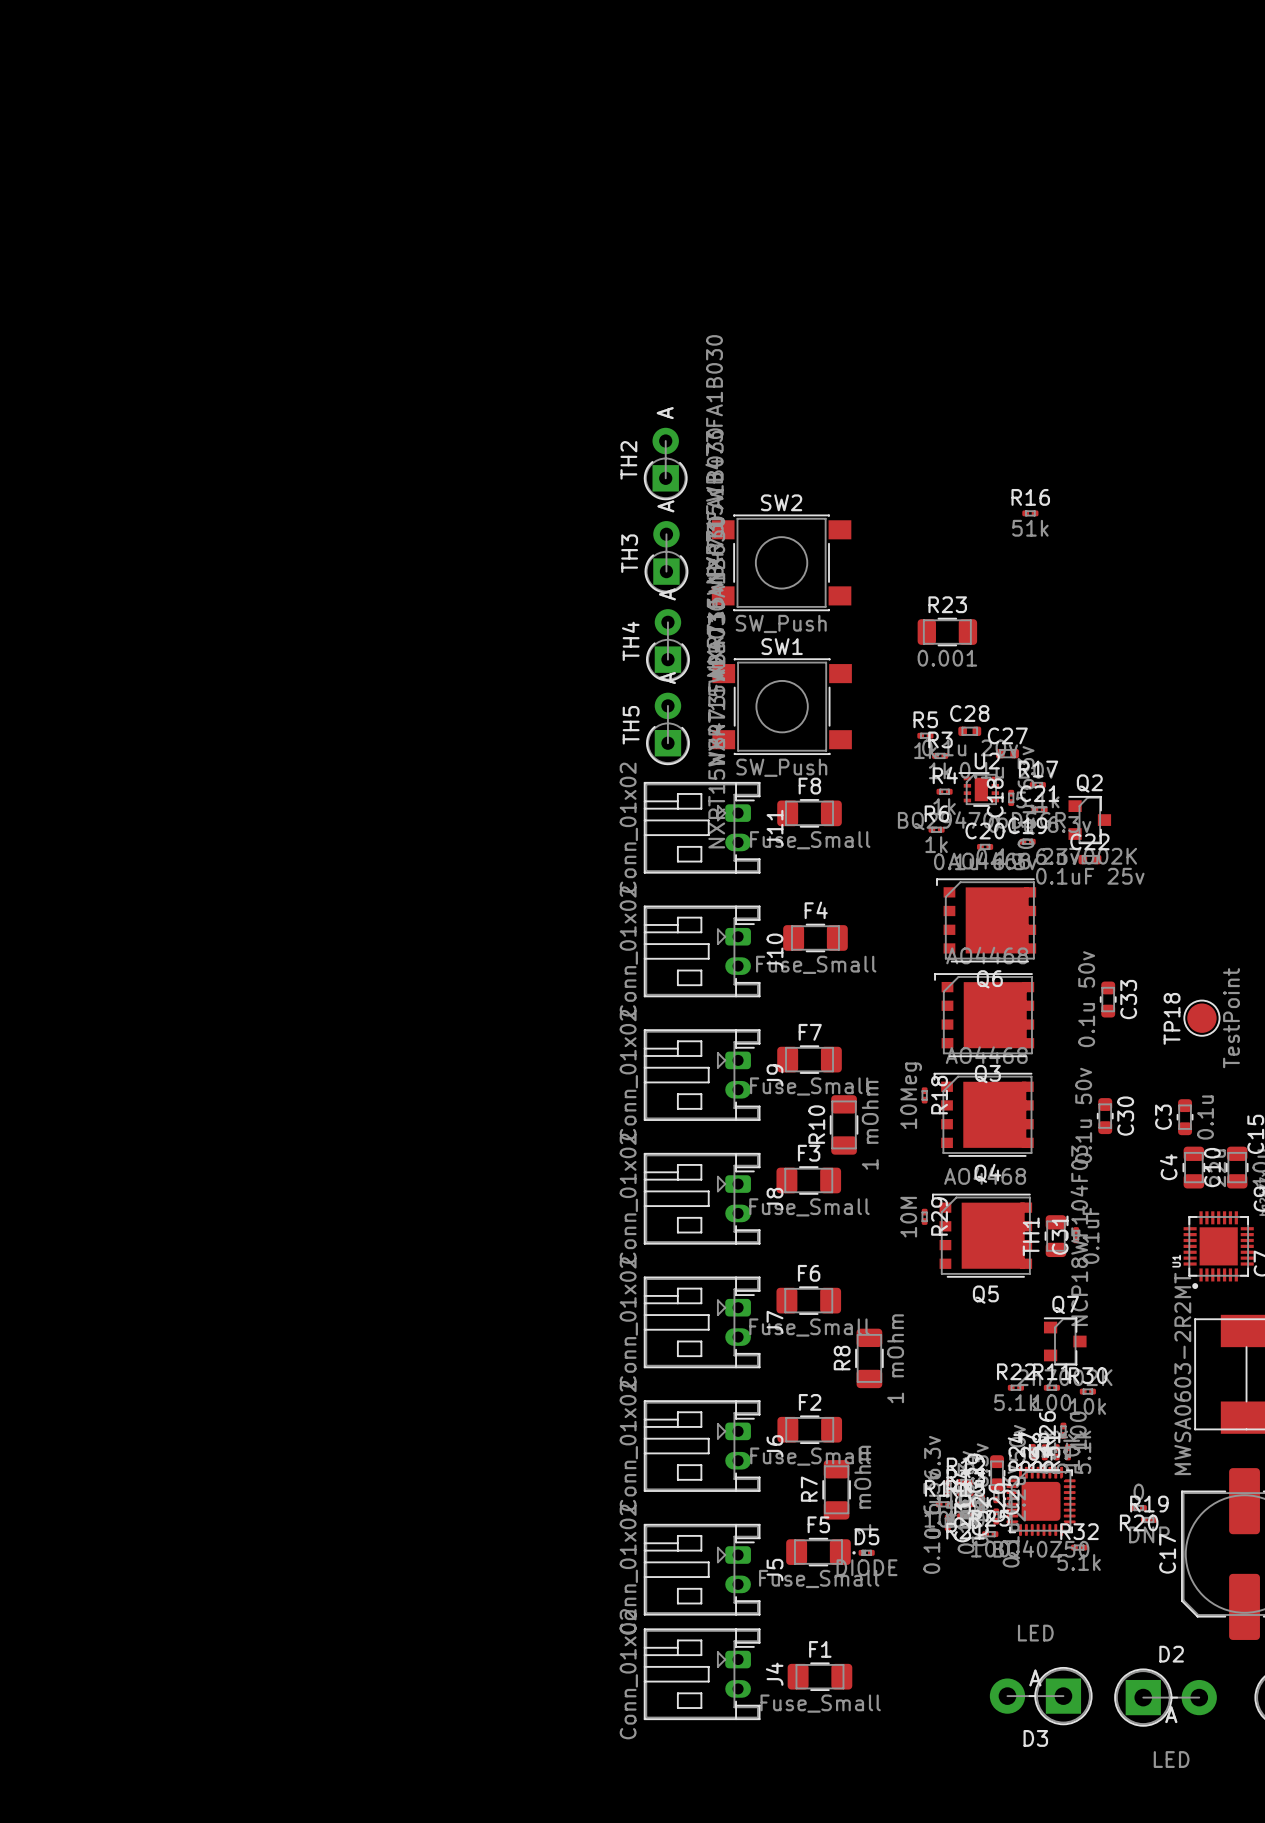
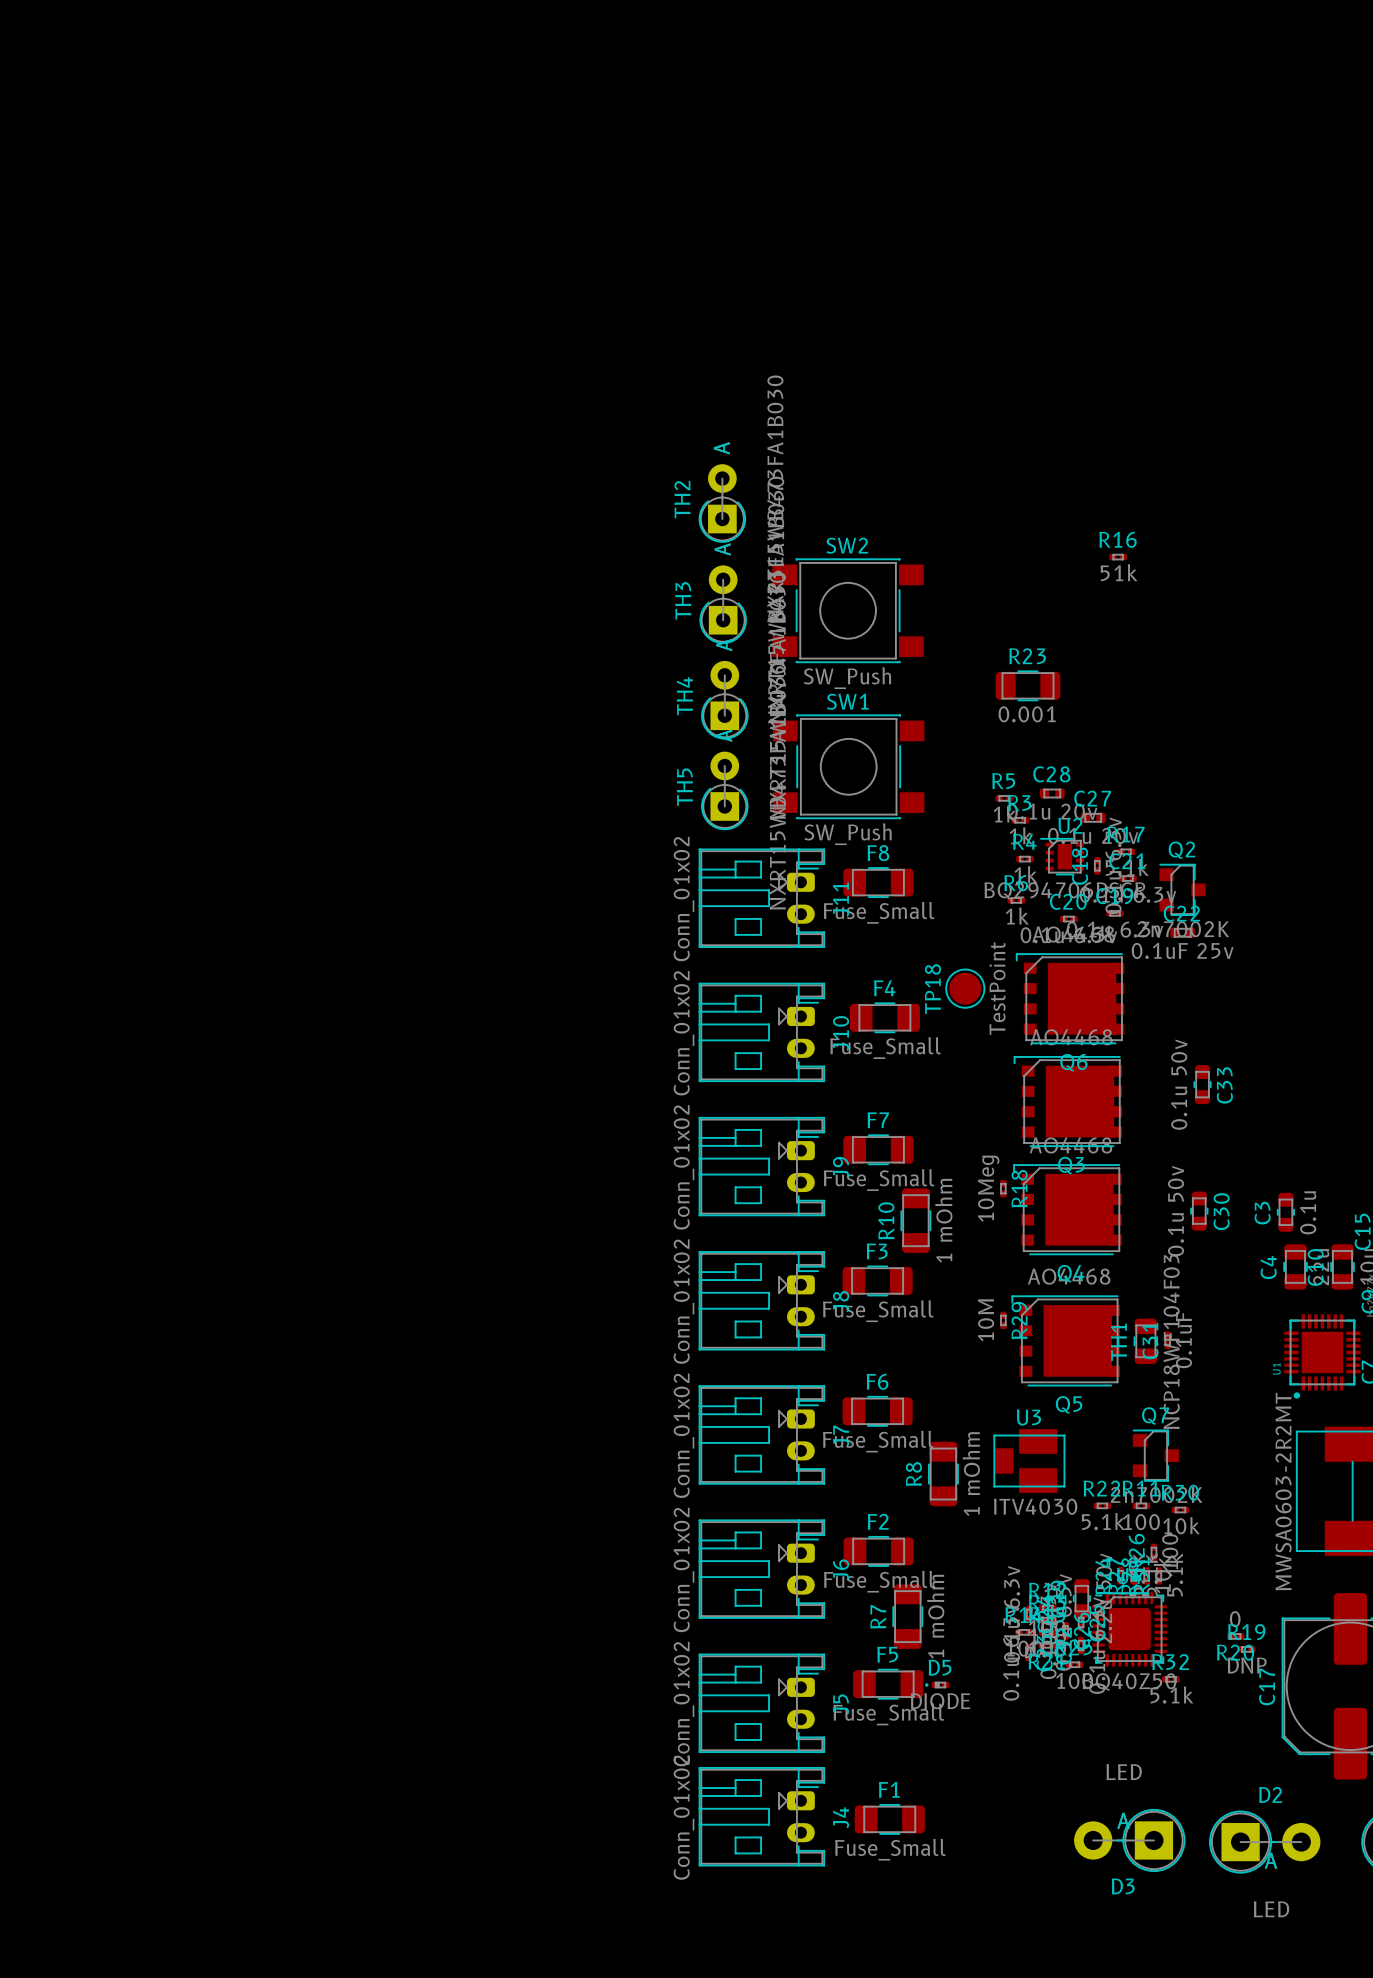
TP18 position: (1201, 1018) -> (965, 988)
U3: none -> ITV4030 (1029, 1461)

